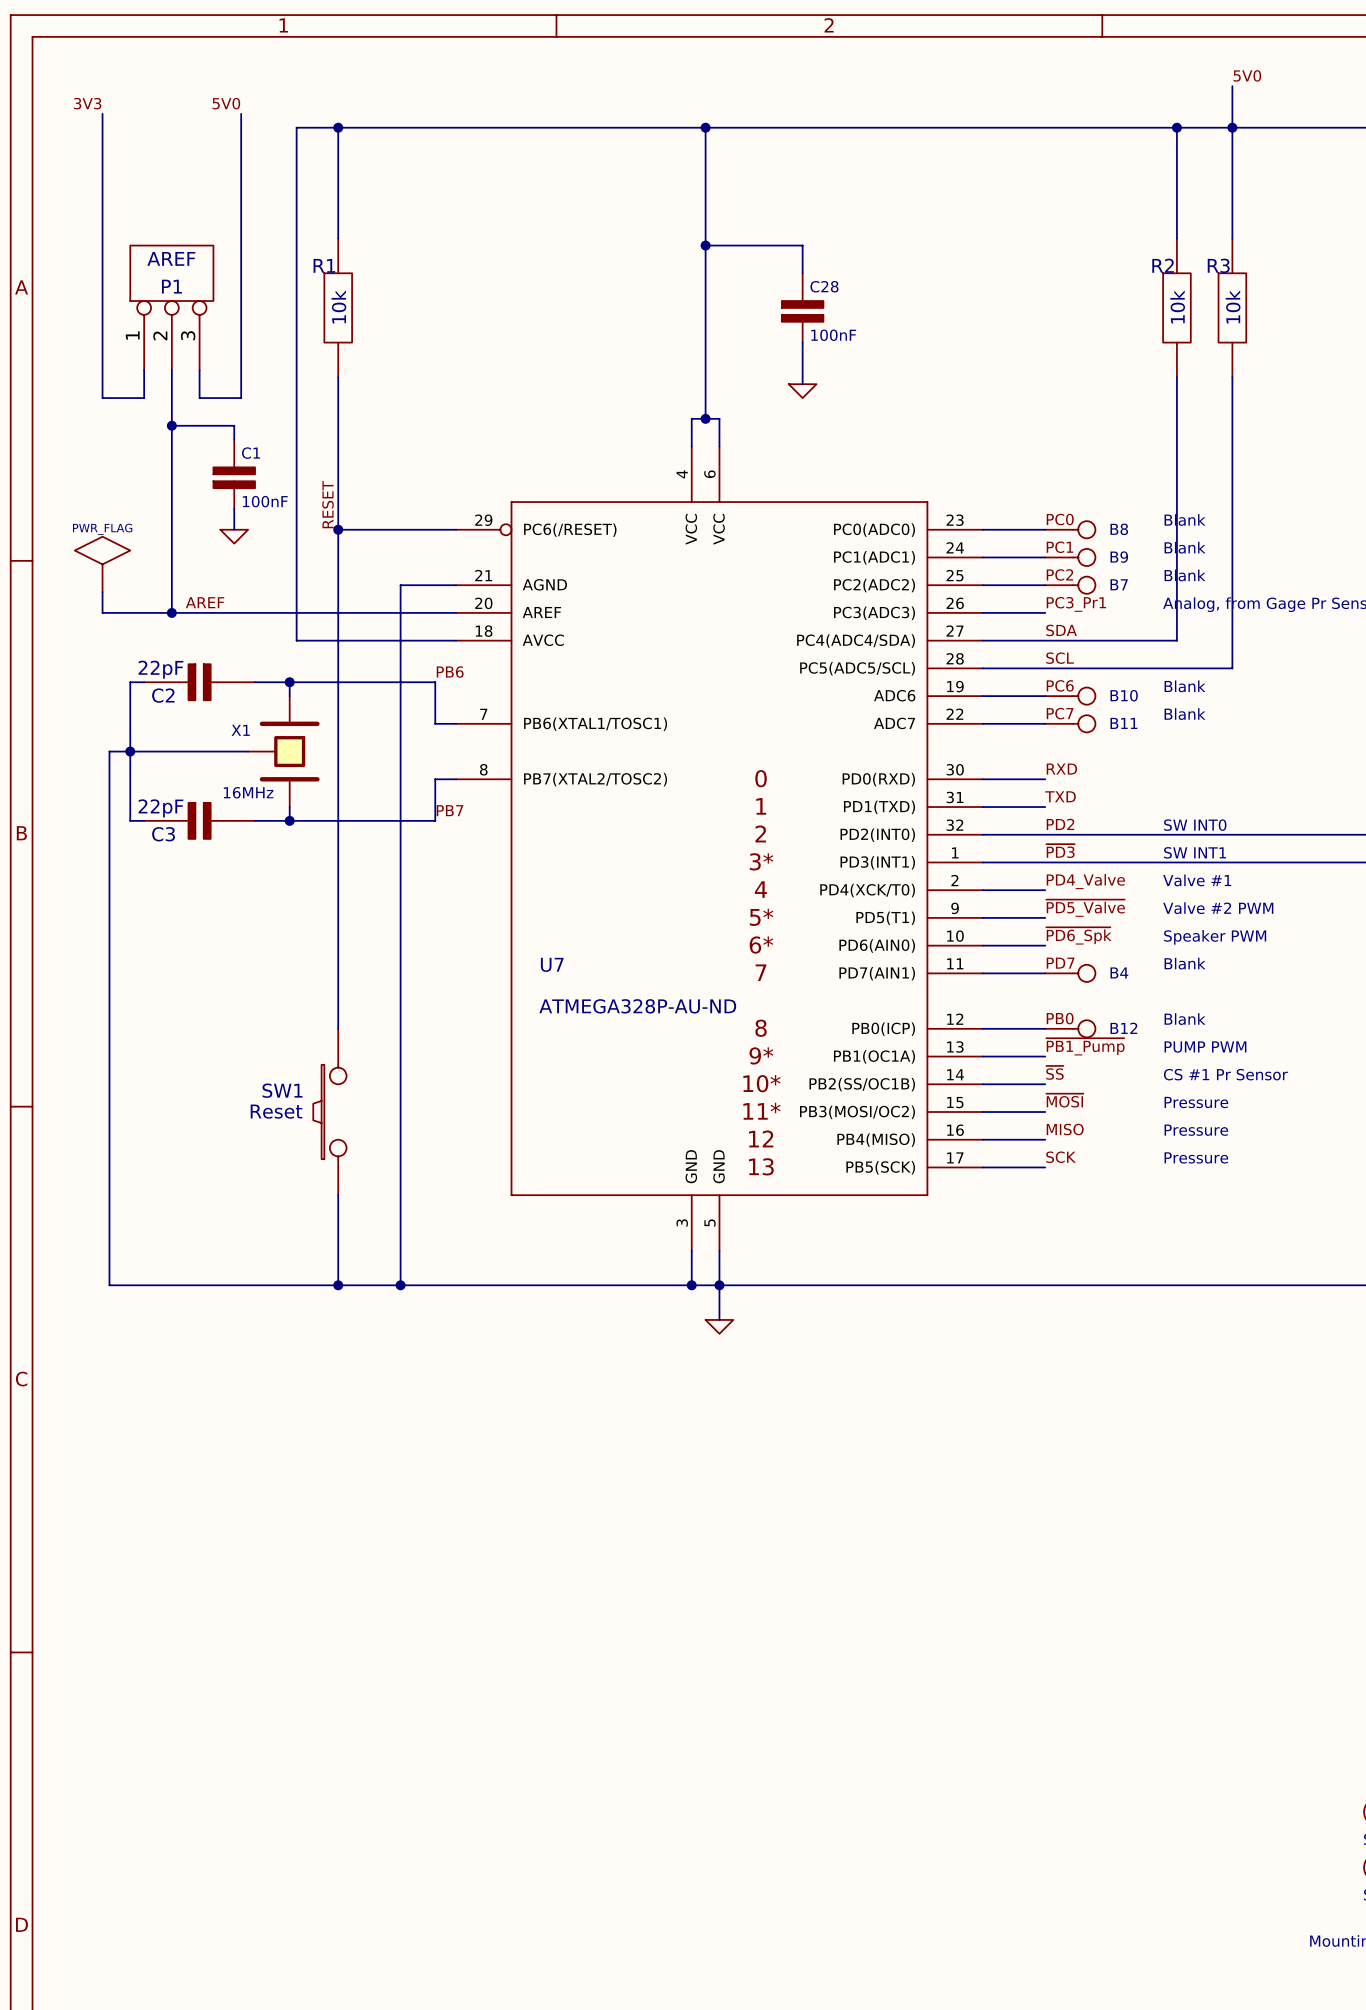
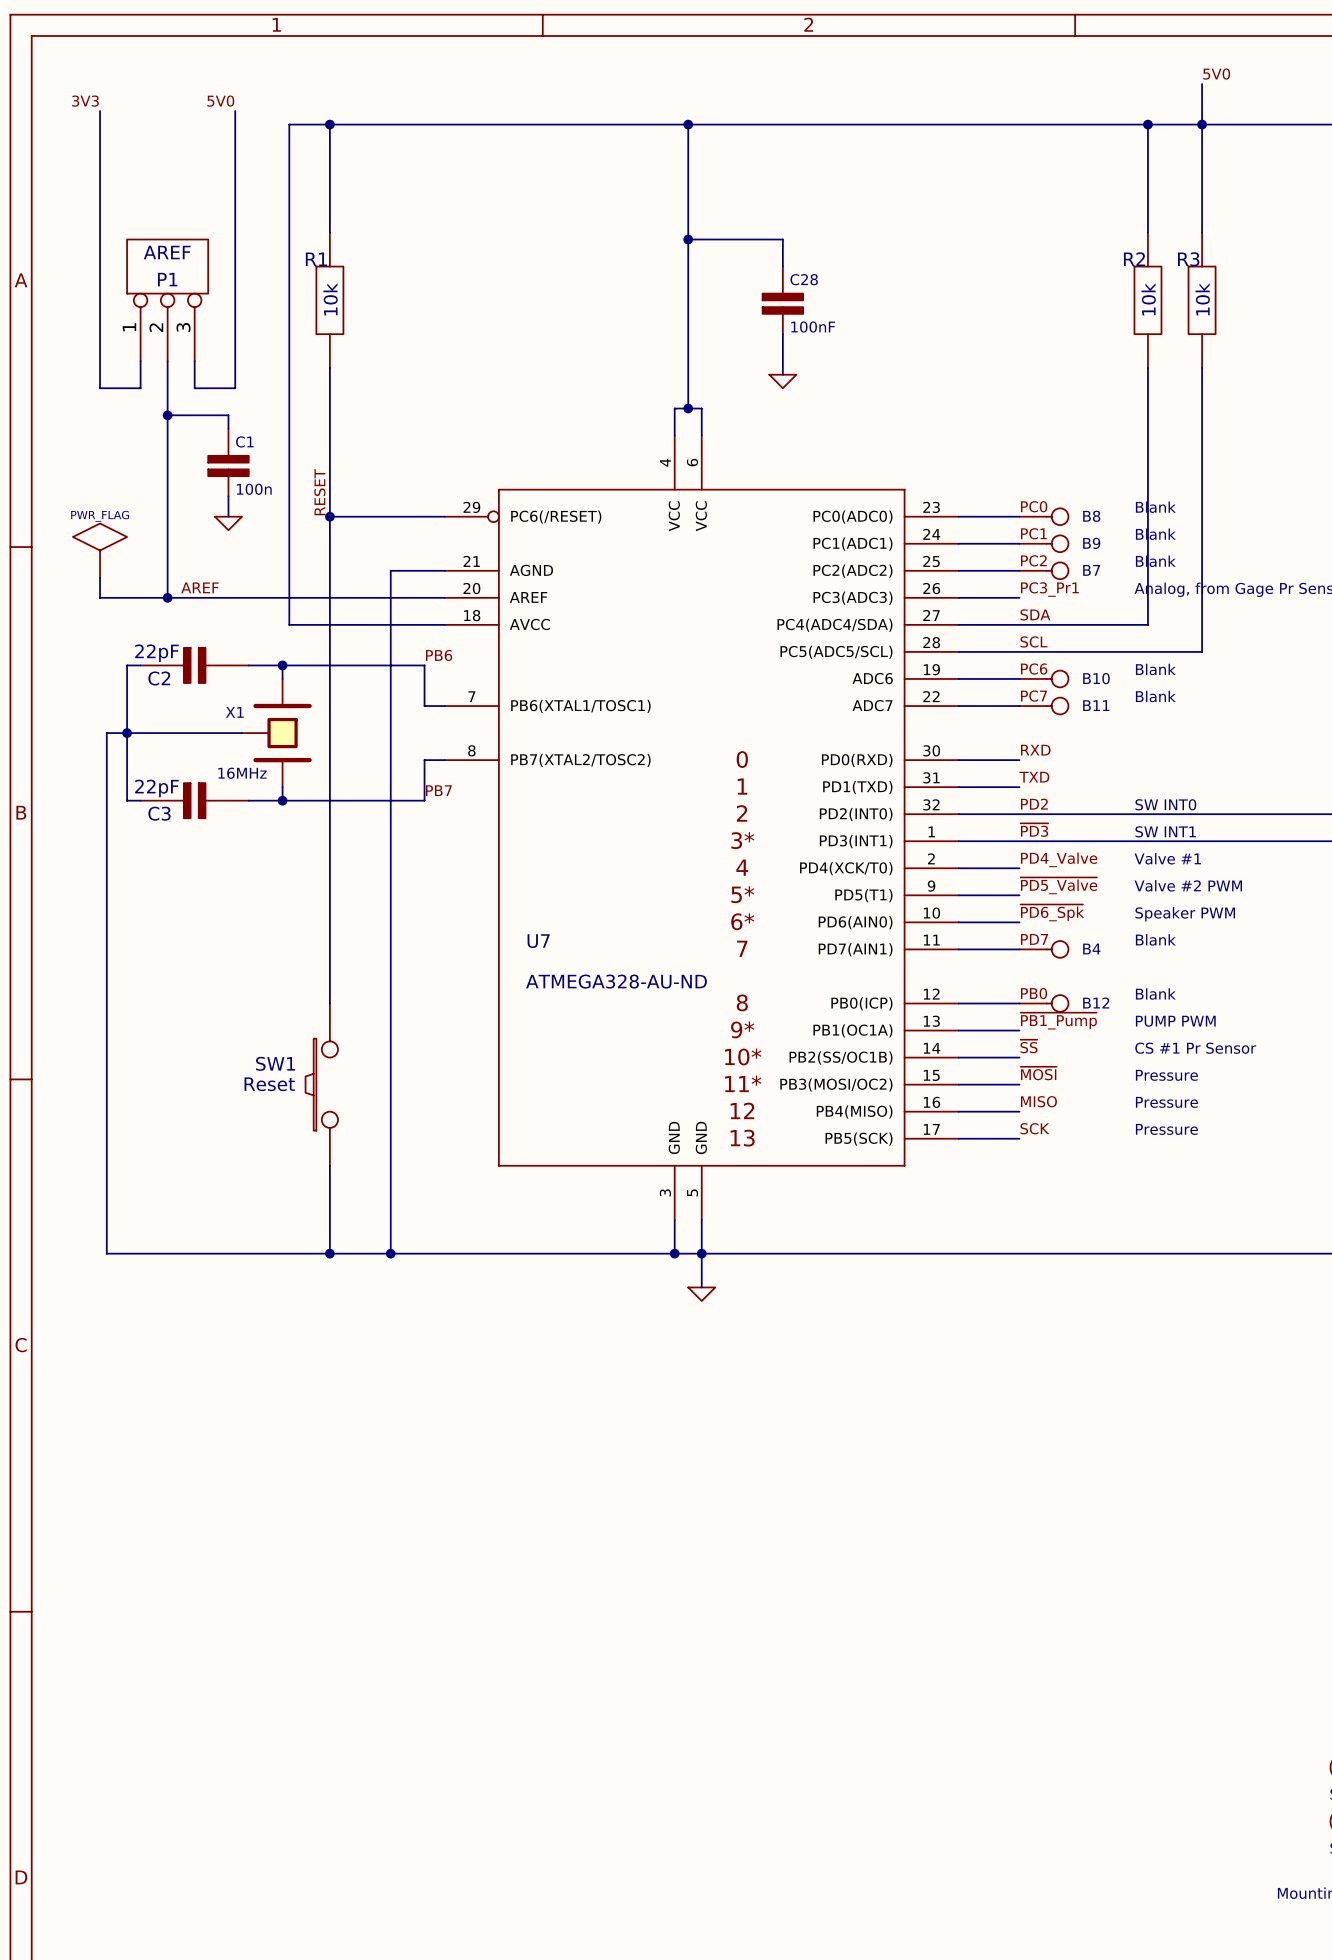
C1 value: 100nF (265, 501) -> 100n (254, 489)
U7 value: ATMEGA328P-AU-ND (637, 1006) -> ATMEGA328-AU-ND (616, 981)

